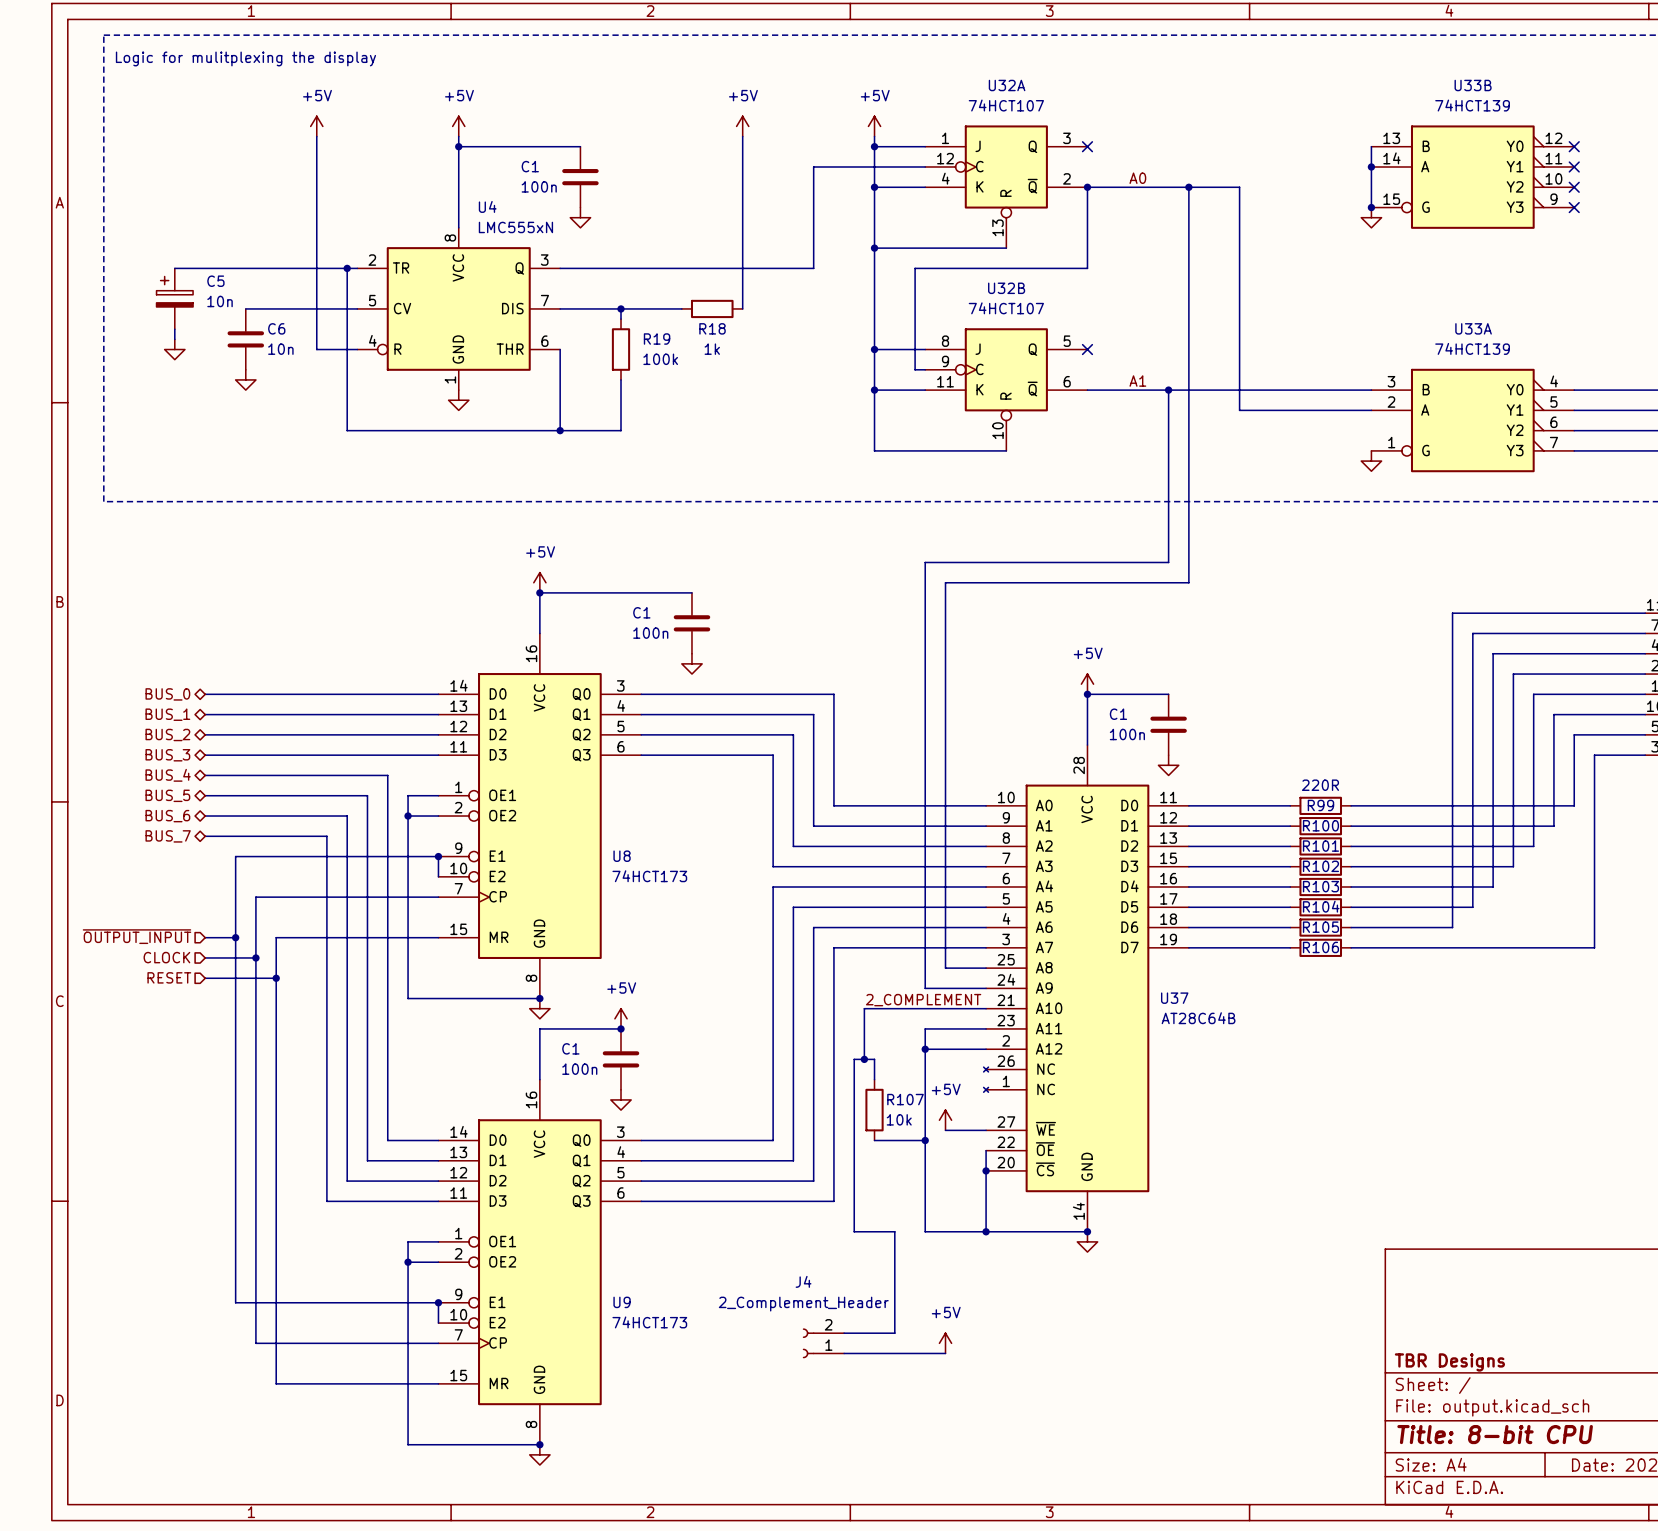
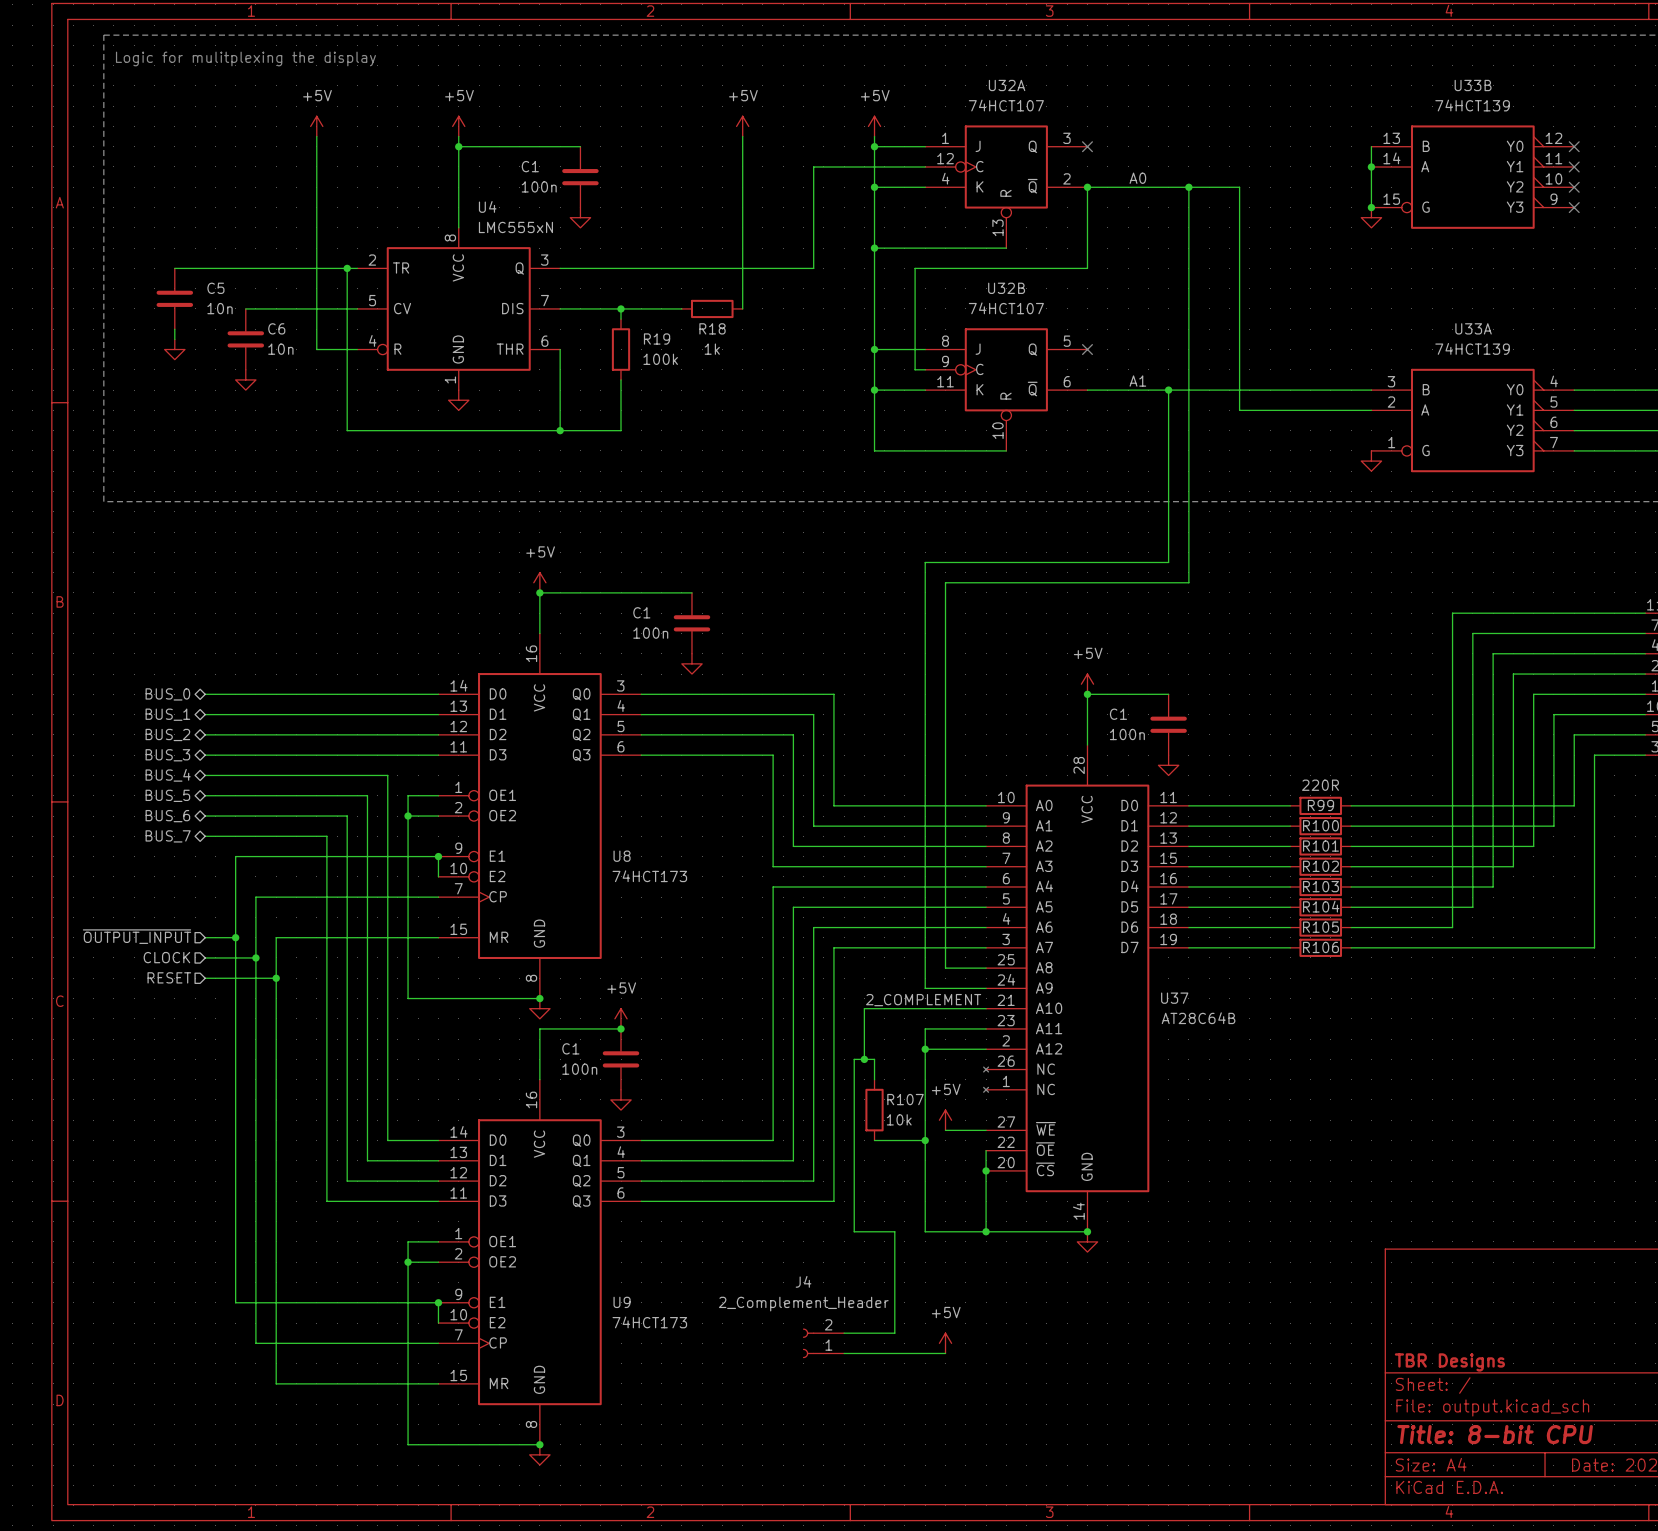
C5 symbol: [156, 268, 194, 330] -> [156, 268, 194, 330]

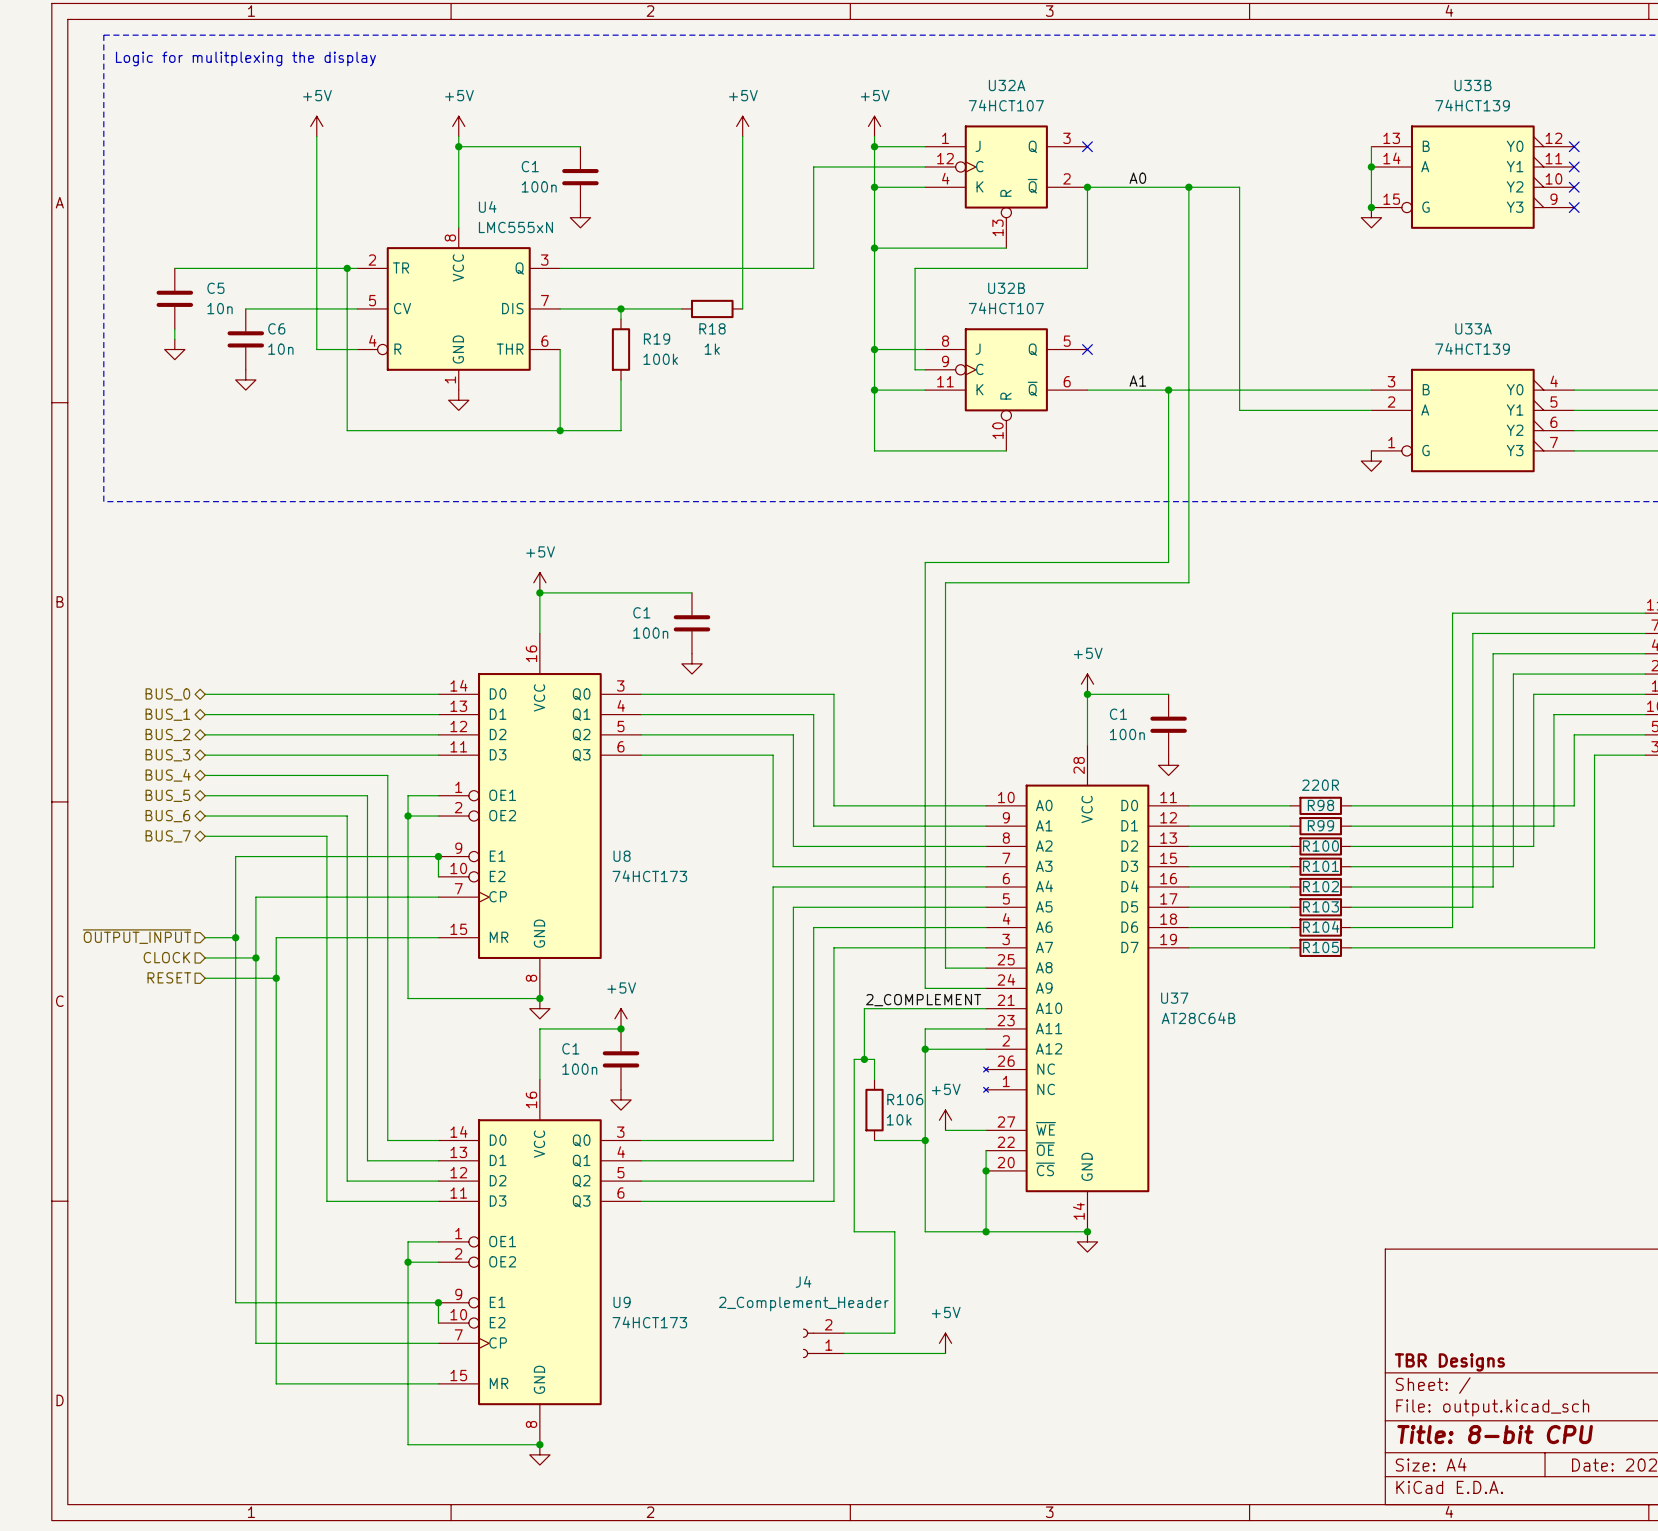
R99 name: R99 (1320, 805) -> R98 (1320, 805)
R100 name: R100 (1320, 825) -> R99 (1320, 825)
R101 name: R101 (1320, 846) -> R100 (1320, 846)
R102 name: R102 (1320, 866) -> R101 (1320, 866)
R103 name: R103 (1320, 886) -> R102 (1320, 886)
R104 name: R104 (1321, 906) -> R103 (1320, 906)
R105 name: R105 (1320, 927) -> R104 (1321, 926)
R106 name: R106 (1320, 947) -> R105 (1320, 947)
R107 name: R107 (905, 1099) -> R106 (905, 1099)

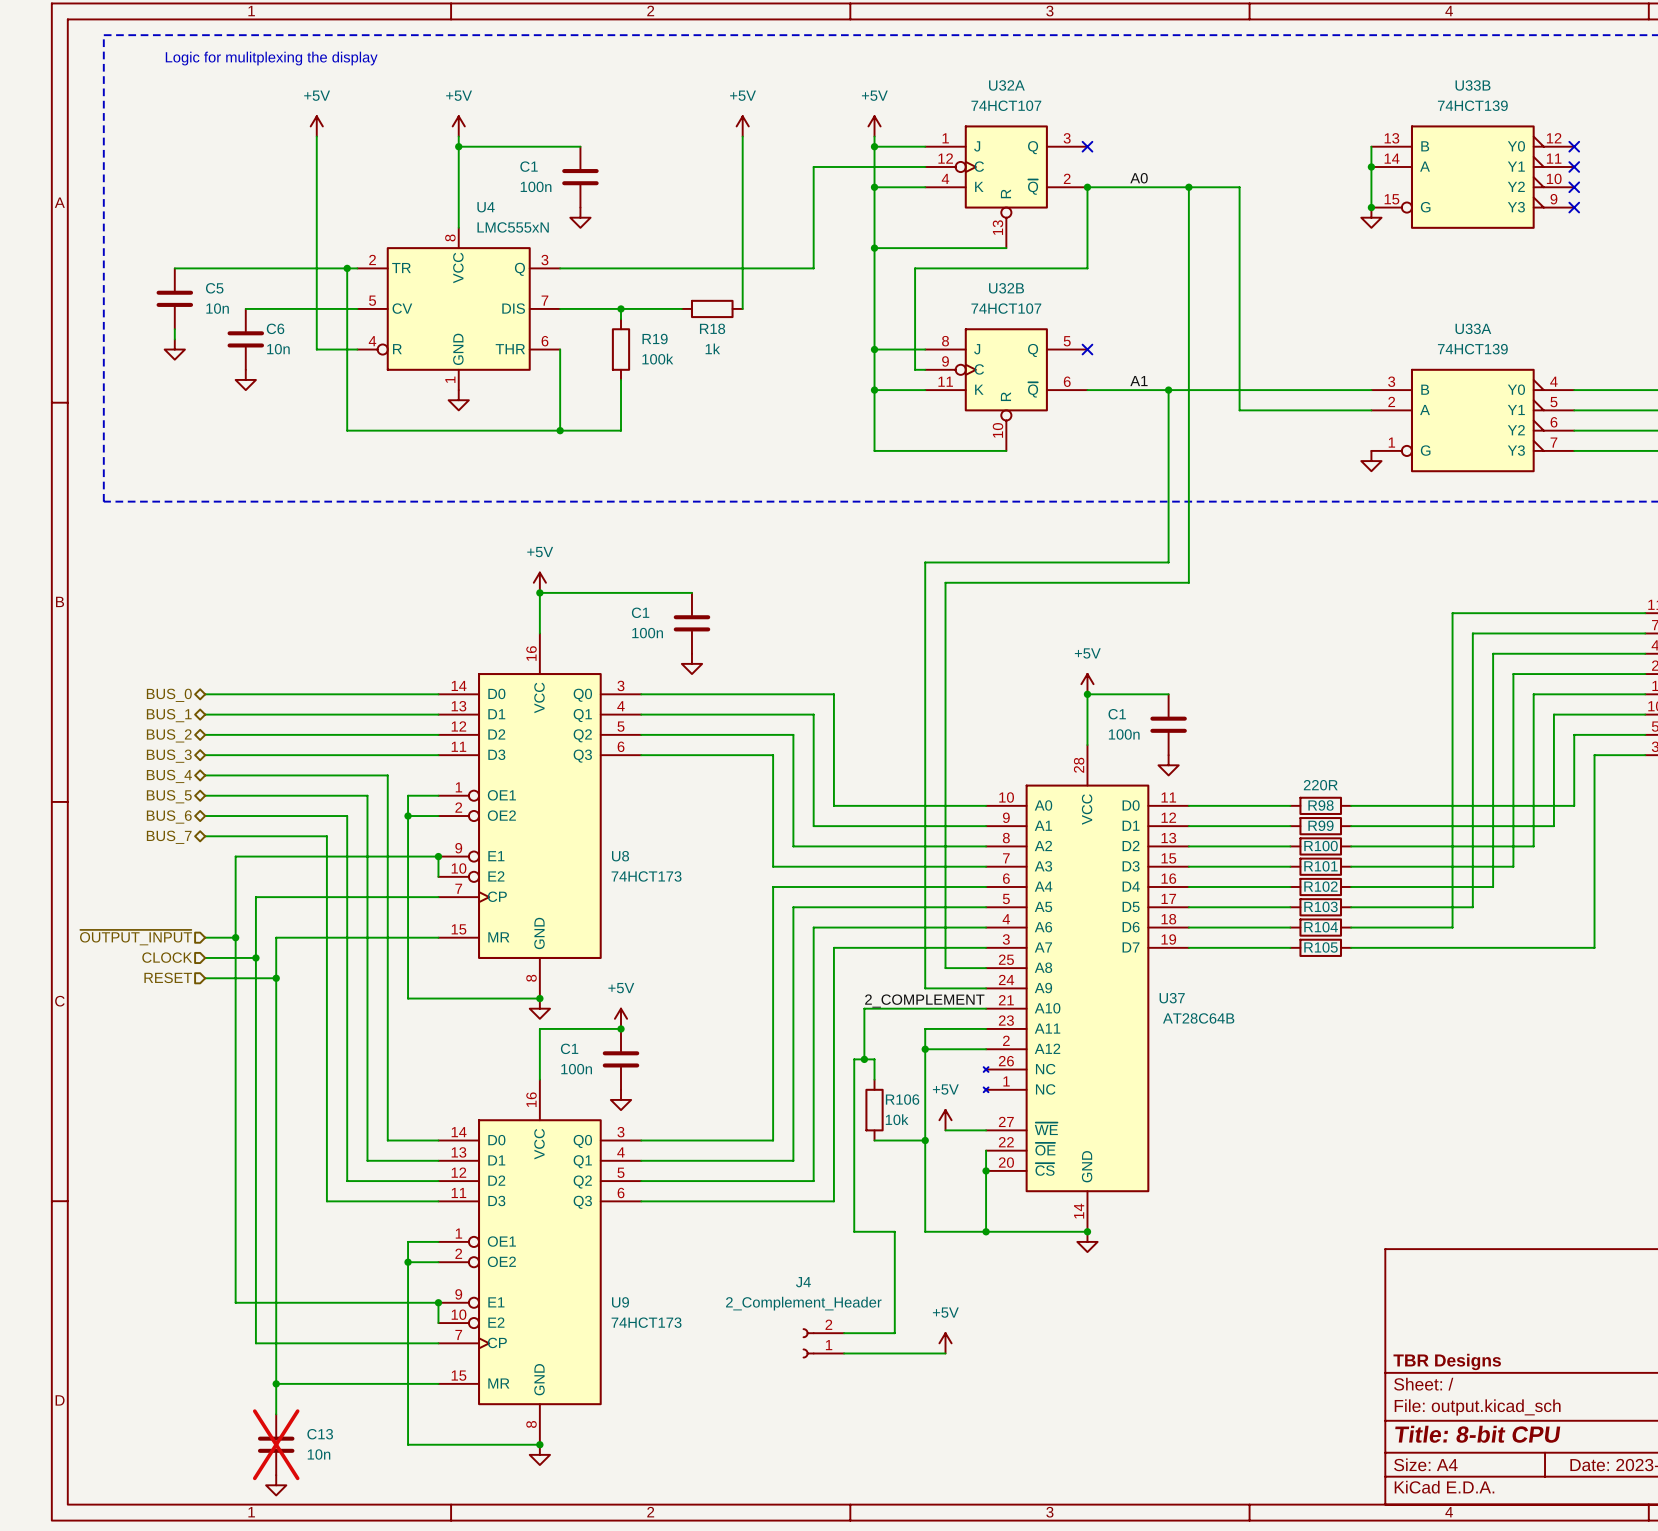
wire: none -> (276, 1383) (276, 1414)
junction: none -> (276, 1383)
C13: none -> 10n (276, 1444)
power symbol: none -> (276, 1485)

